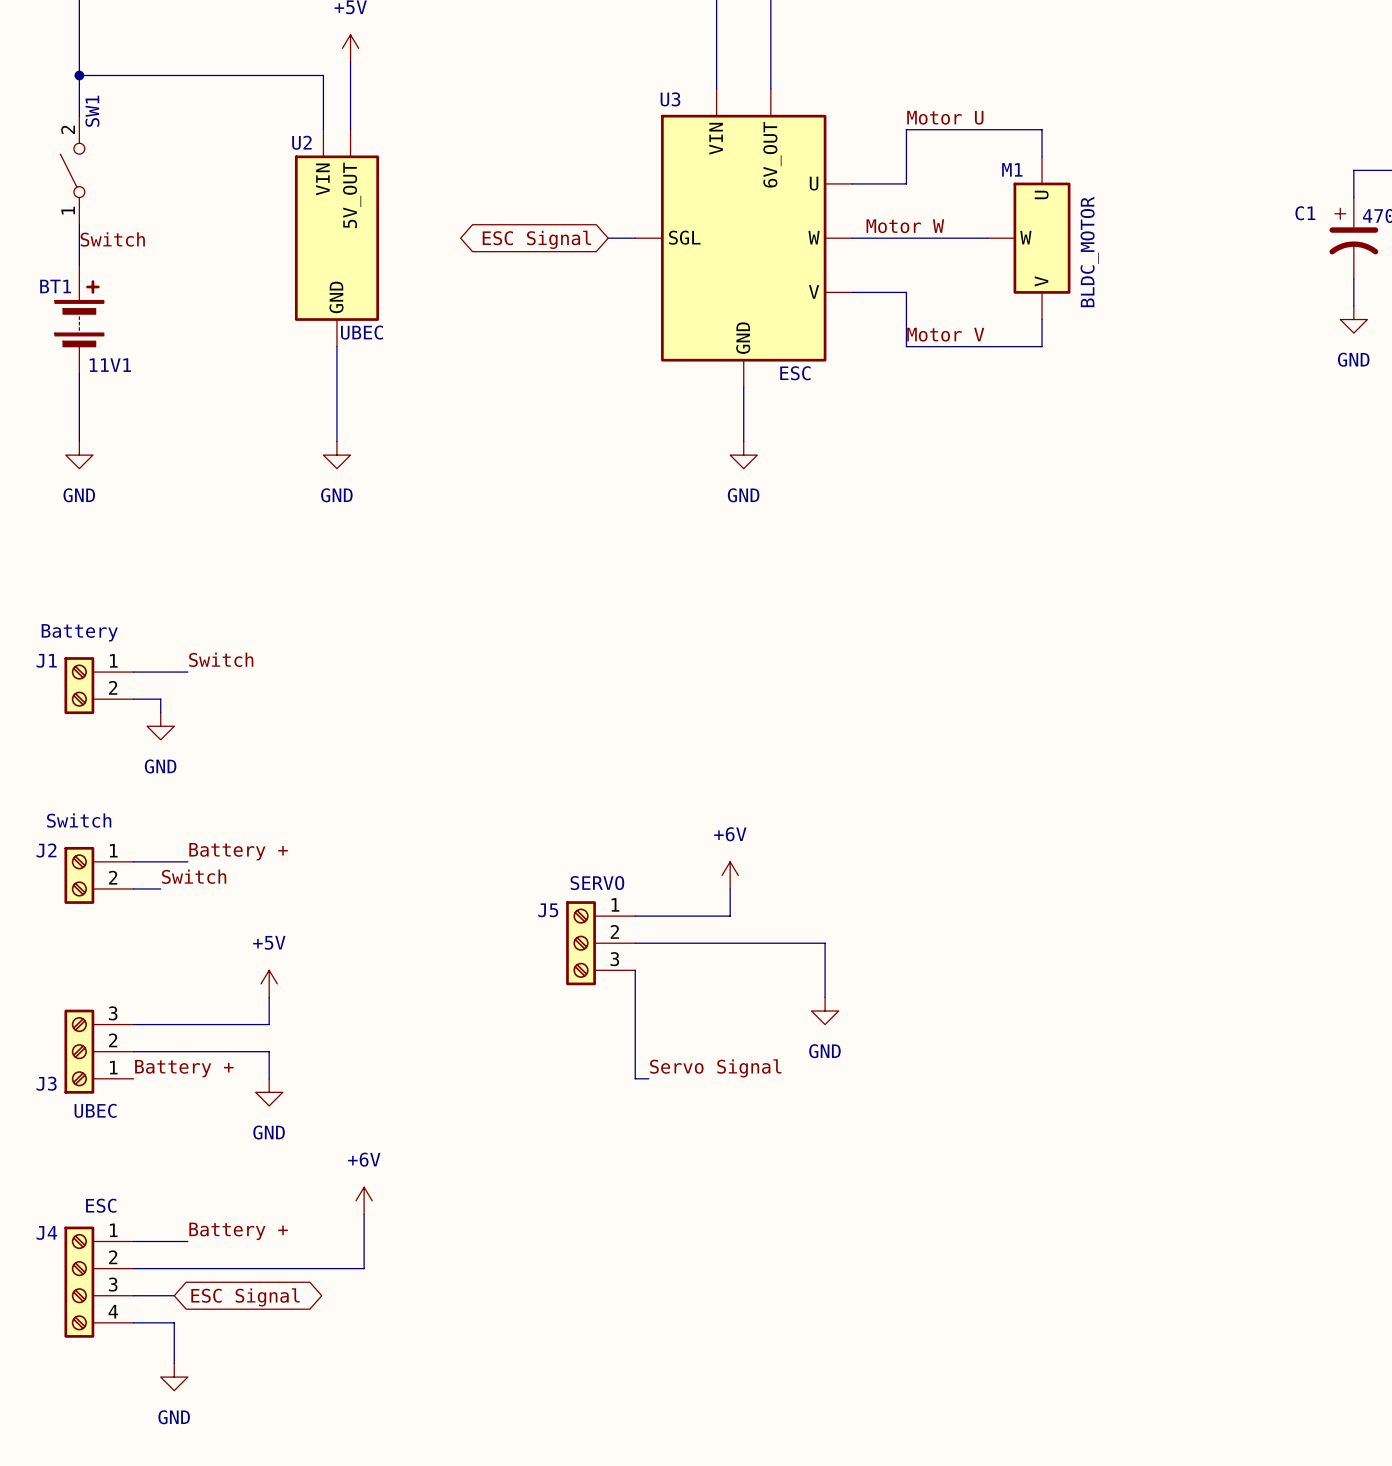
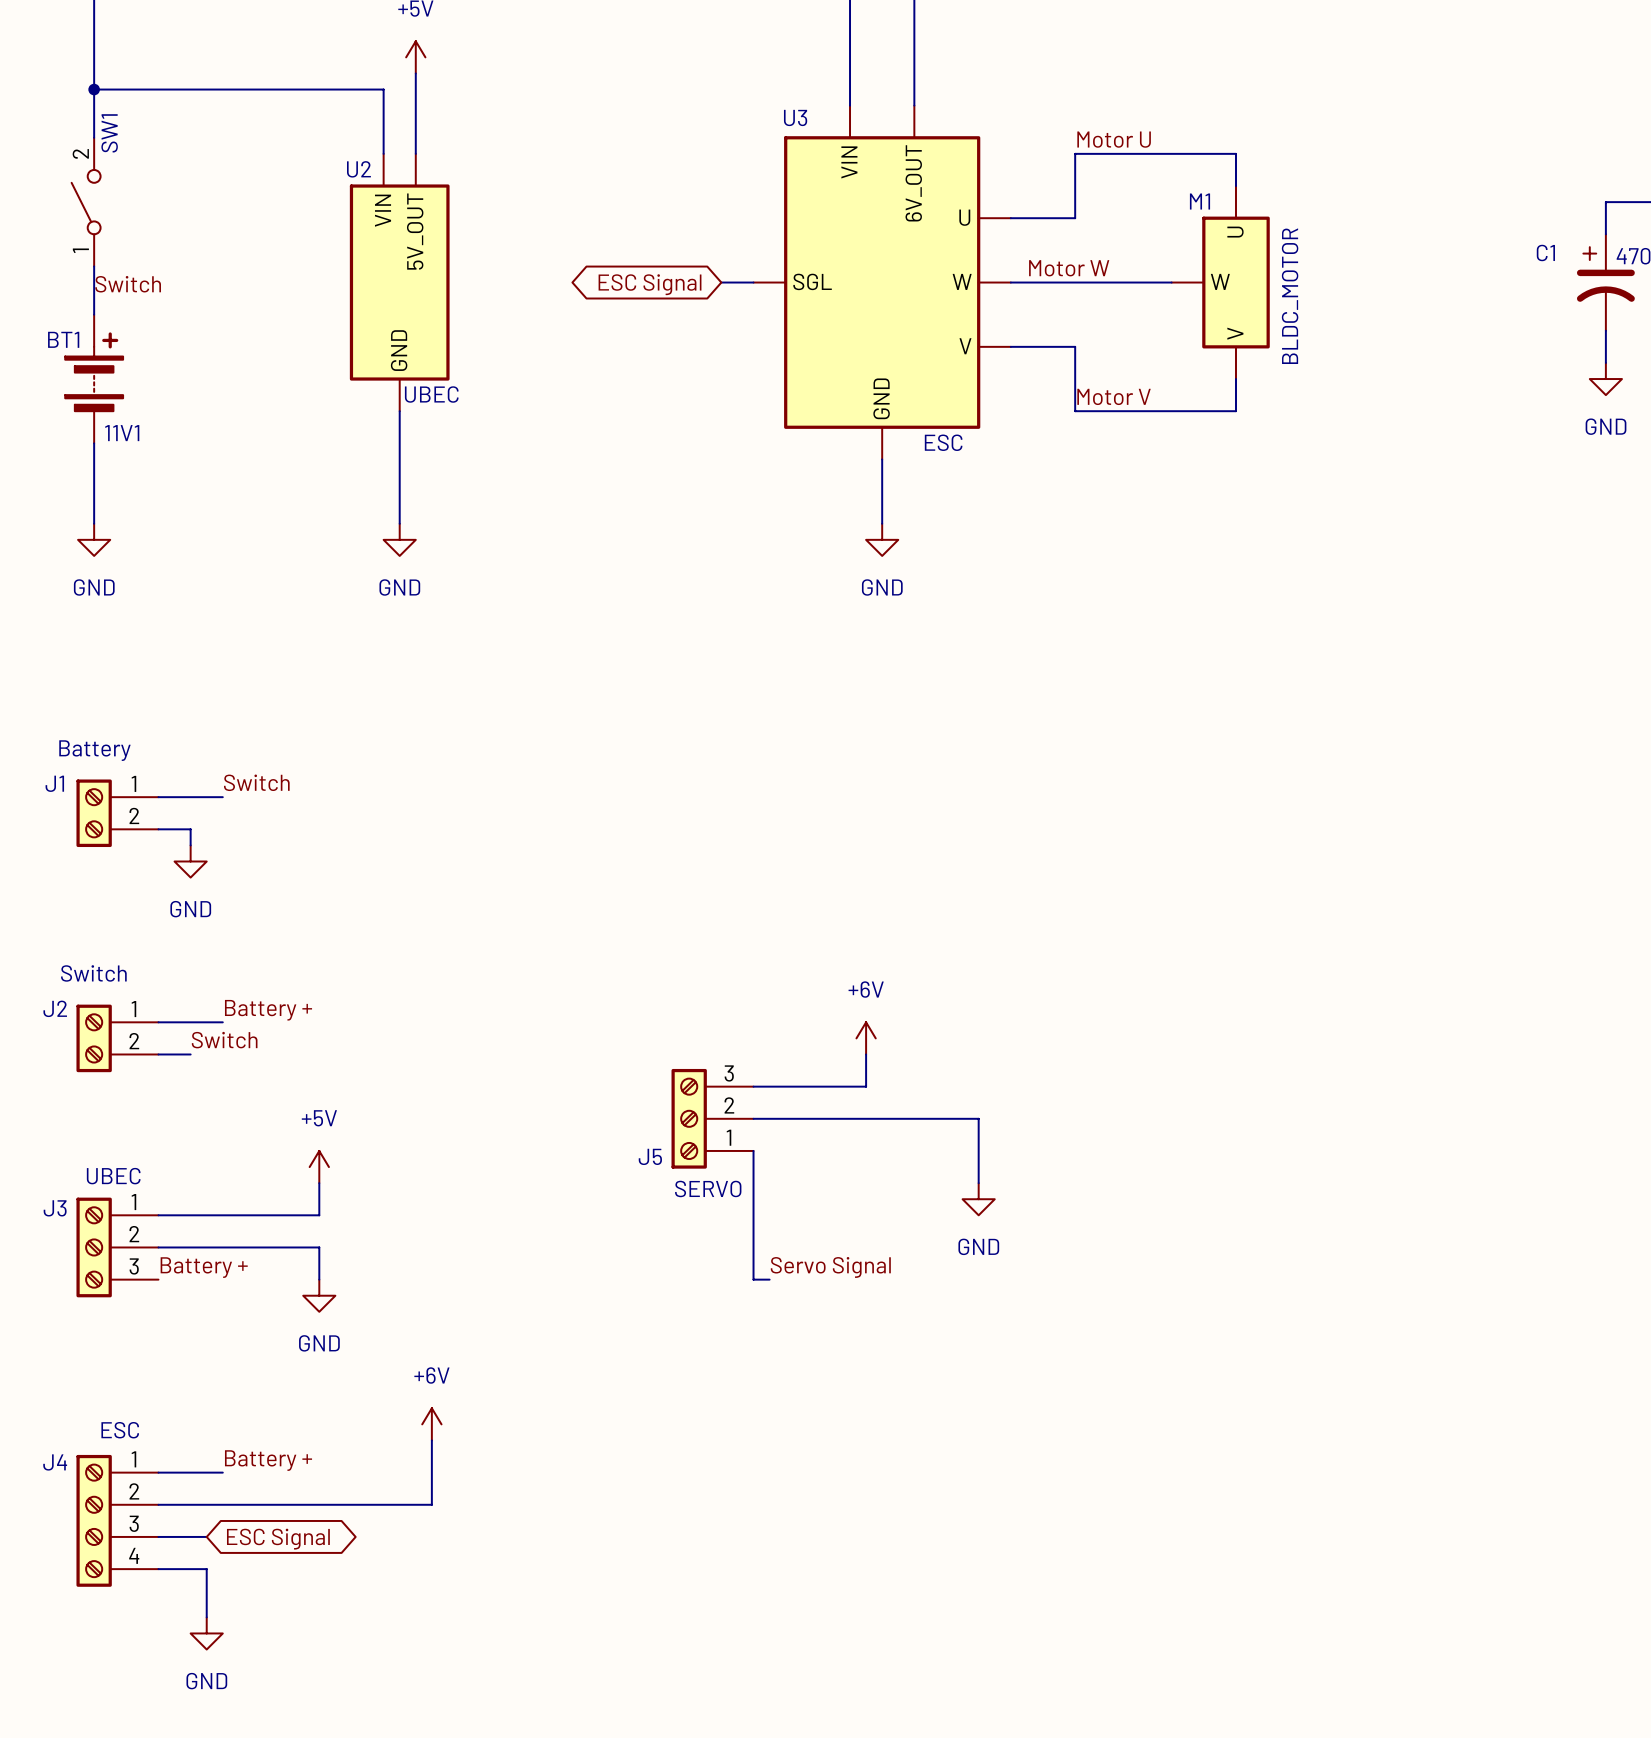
J5 flip: as is (581, 943) -> up-down (689, 1118)
J3 flip: as is (79, 1051) -> up-down (94, 1247)

